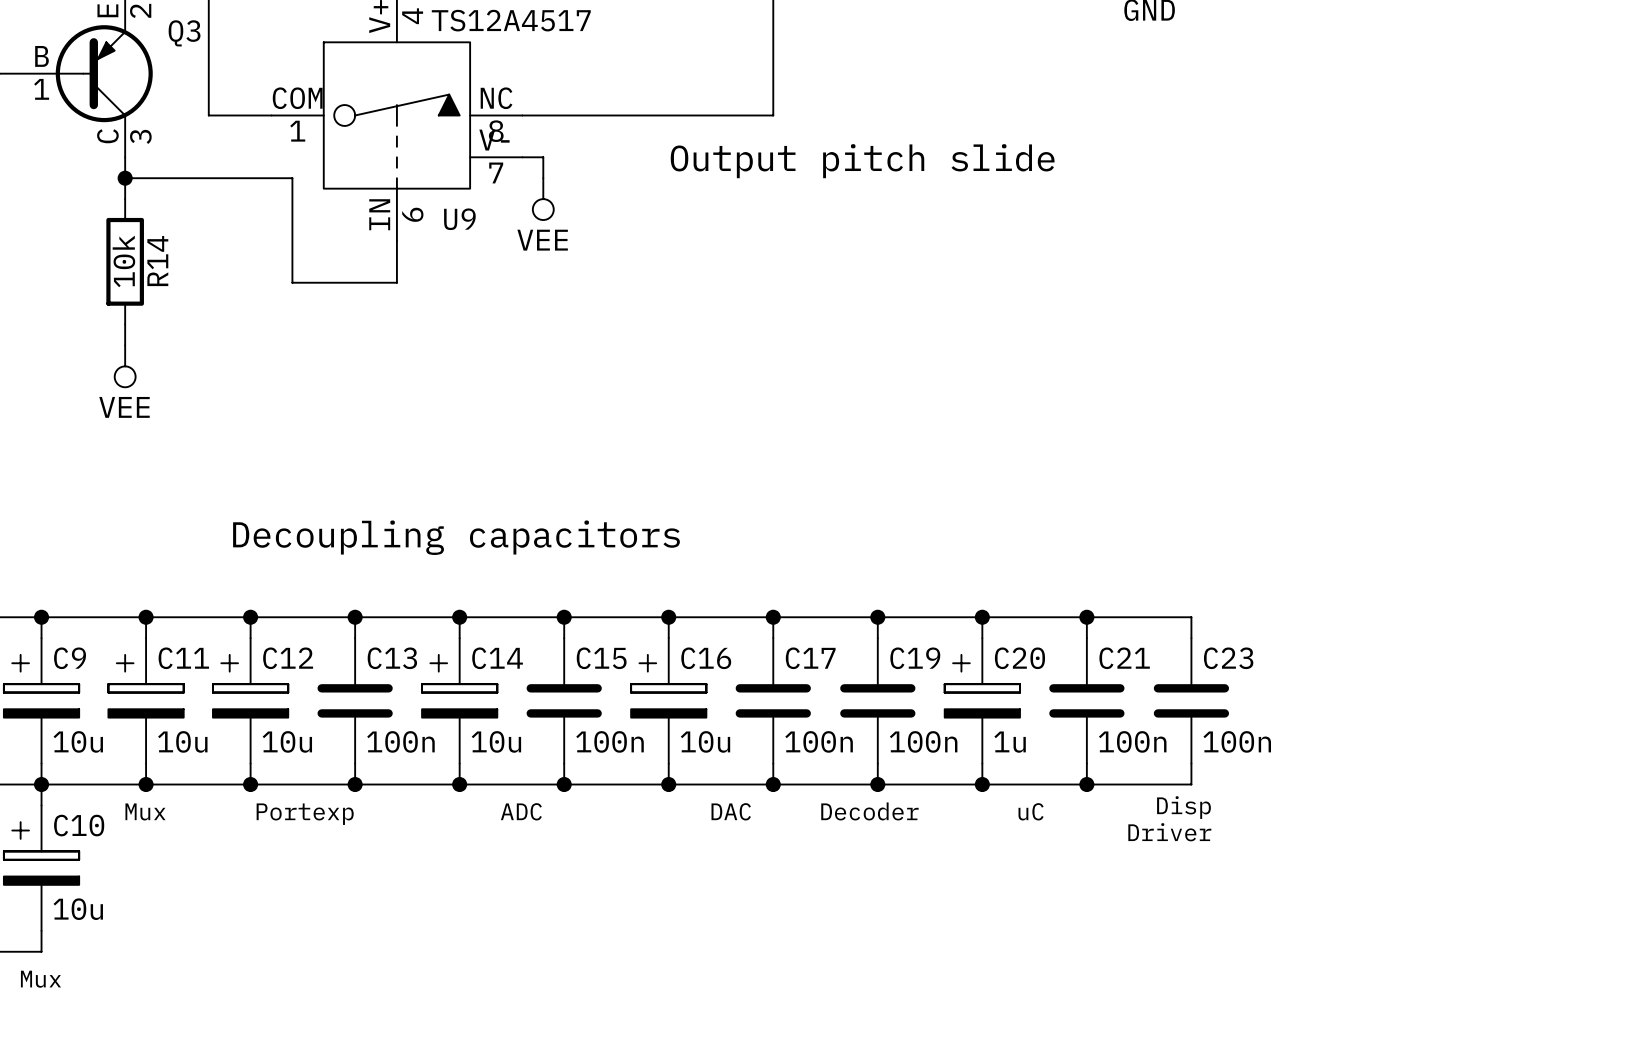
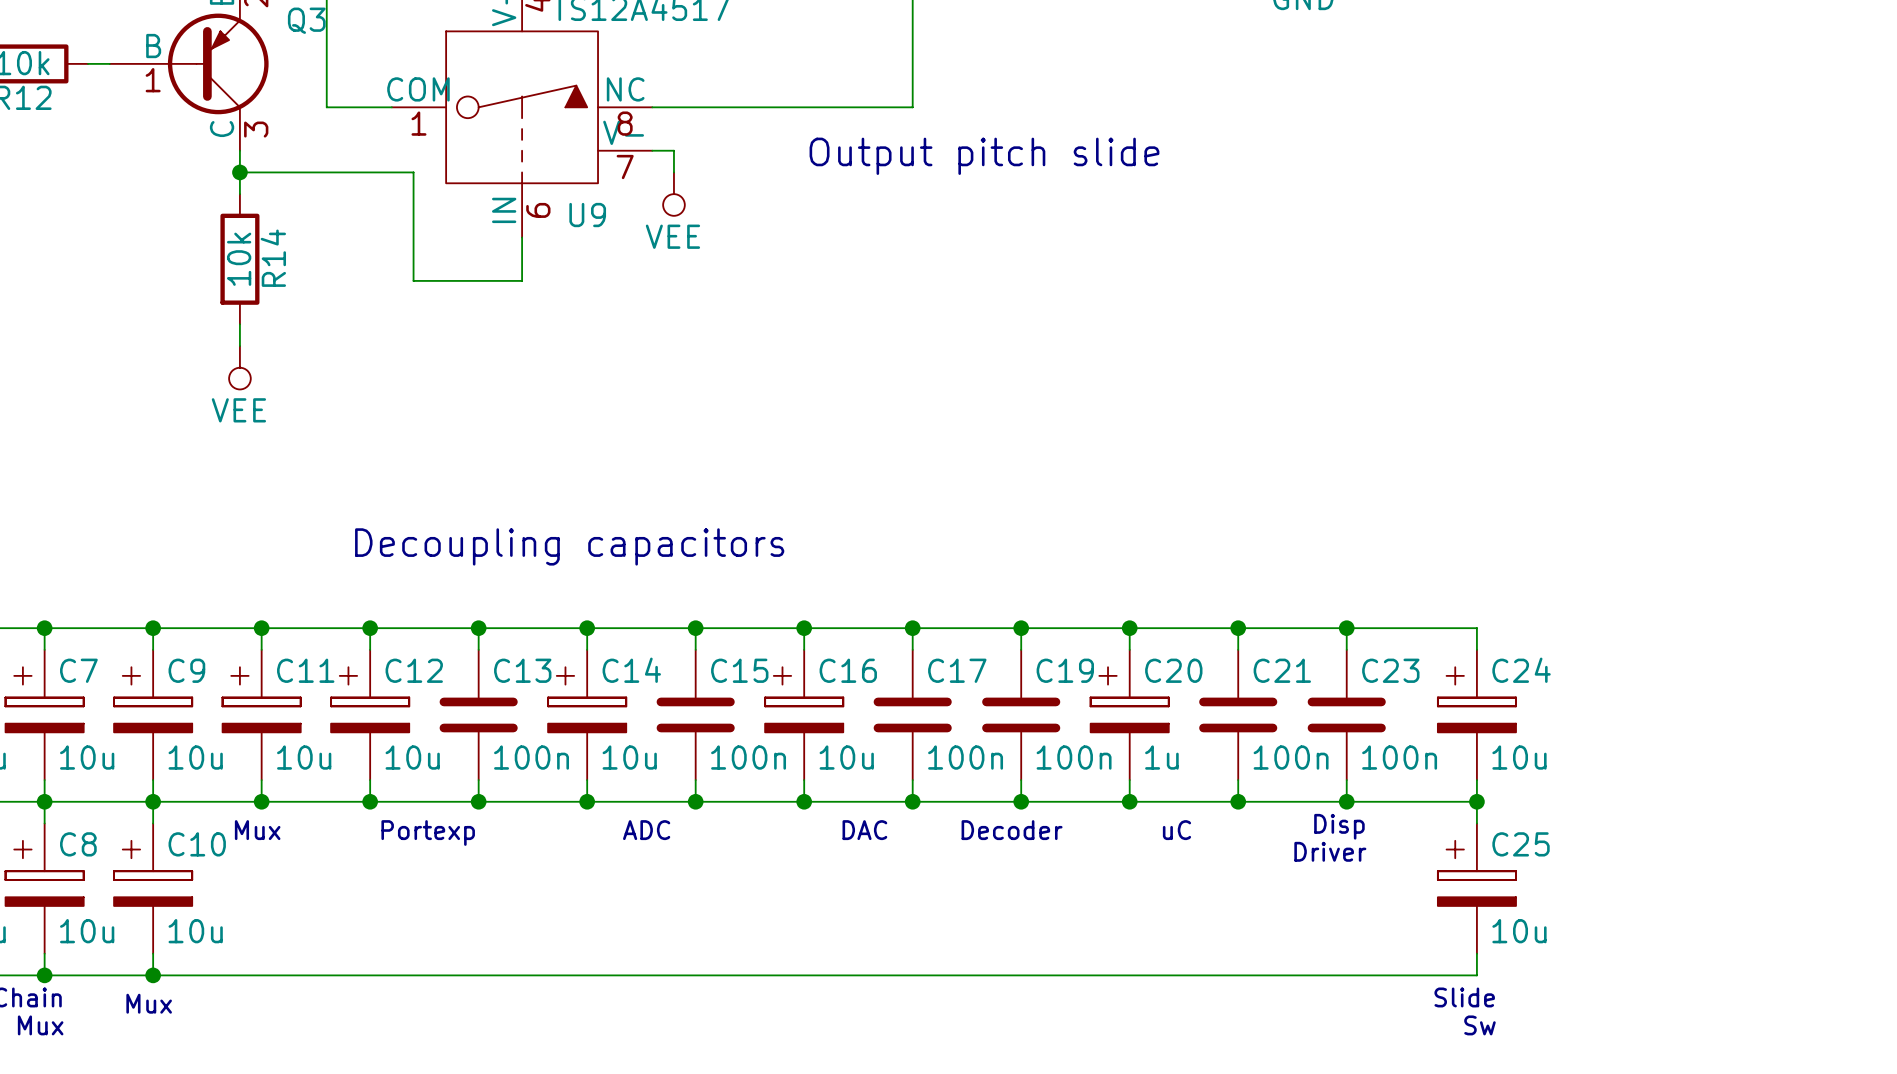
wire: none -> (1346, 628) (1476, 628) (1476, 649)
junction: none -> (1346, 628)
C24: none -> 10u (1476, 714)
wire: none -> (1476, 780) (1476, 823)
wire: none -> (1346, 801) (1476, 801)
junction: none -> (1346, 801)
junction: none -> (1476, 801)
C25: none -> 10u (1476, 888)
wire: none -> (1476, 953) (1476, 975) (153, 975)
junction: none -> (153, 975)
text: none -> Slide (1464, 997)
text: none -> Sw (1479, 1025)

